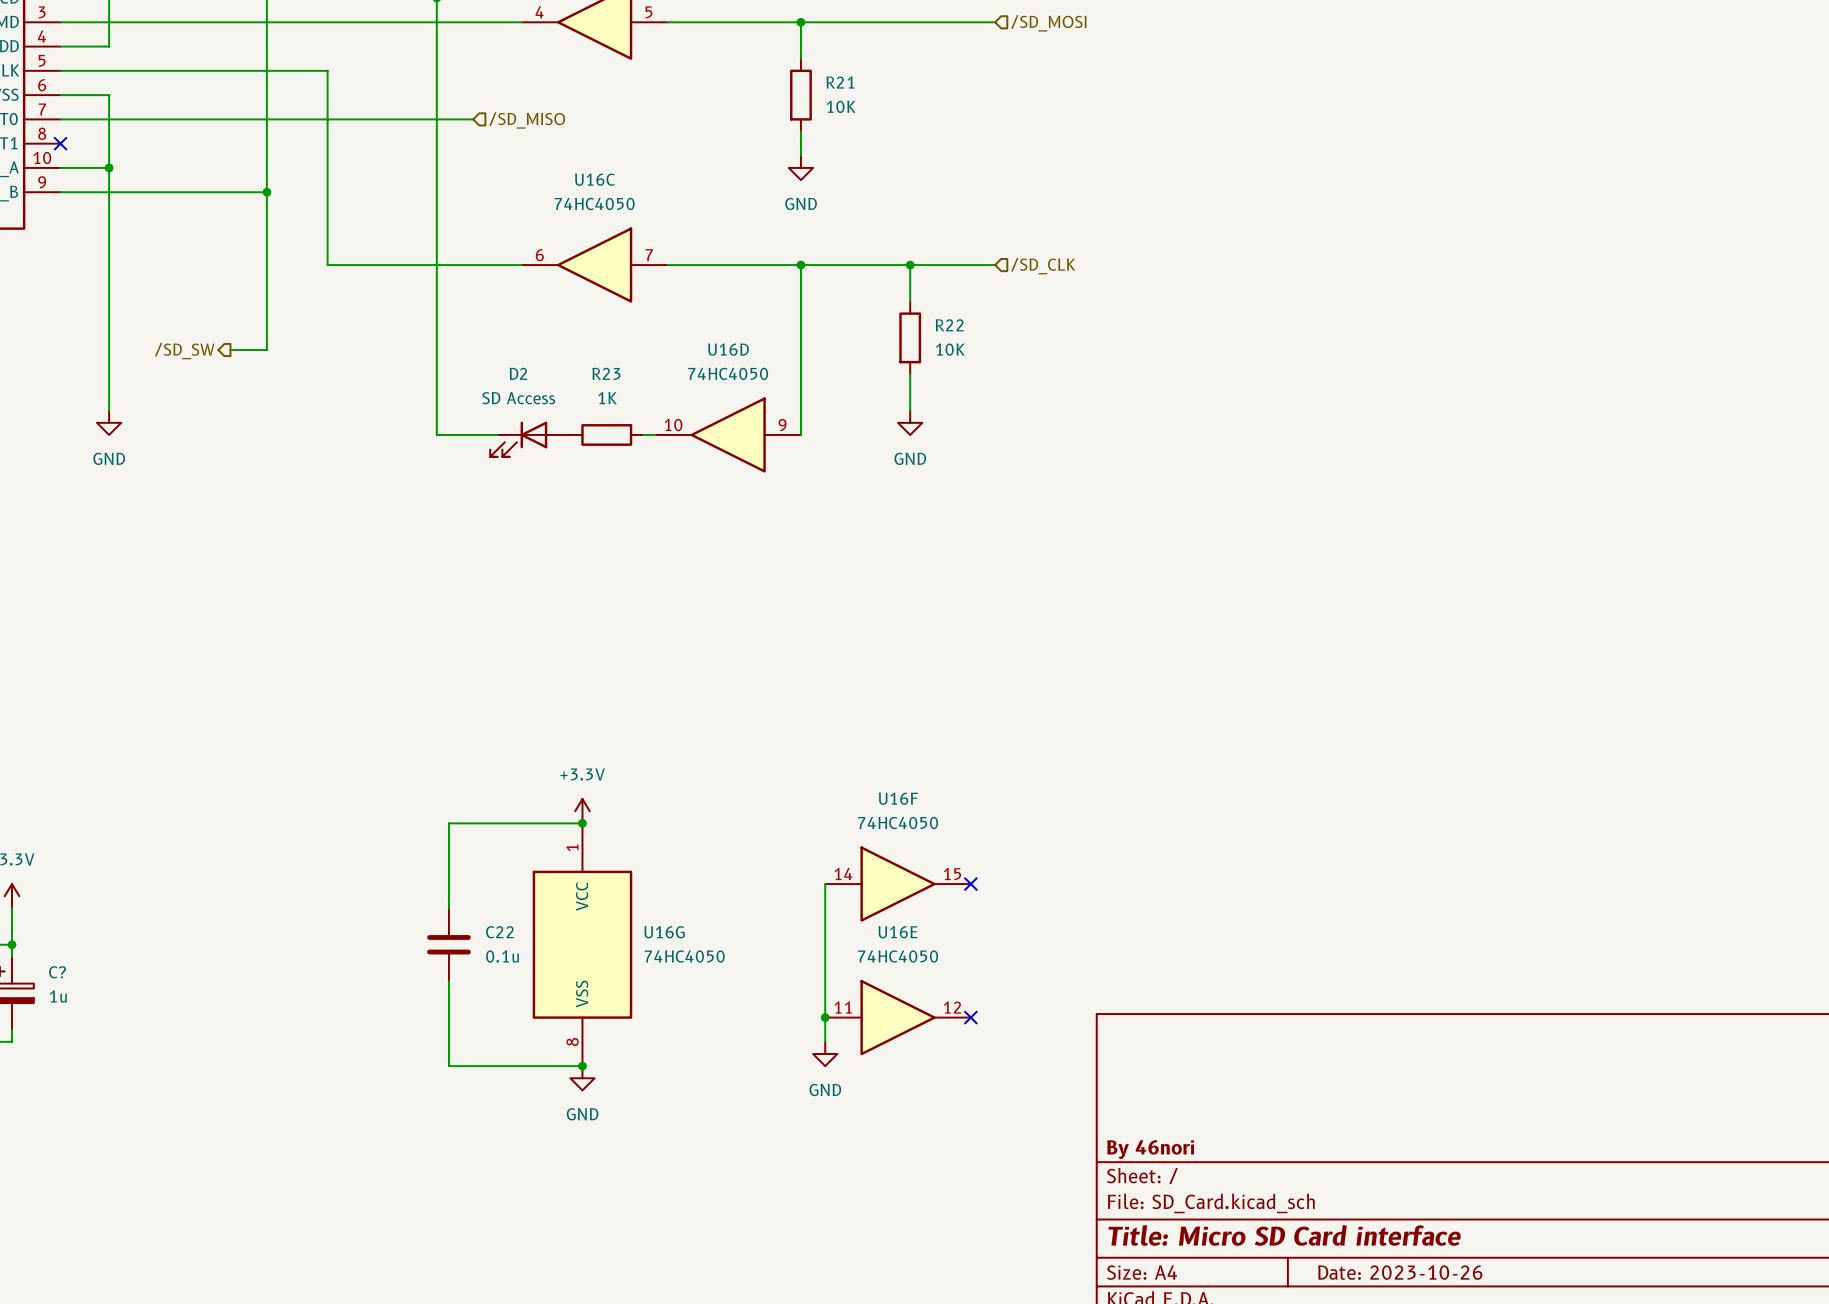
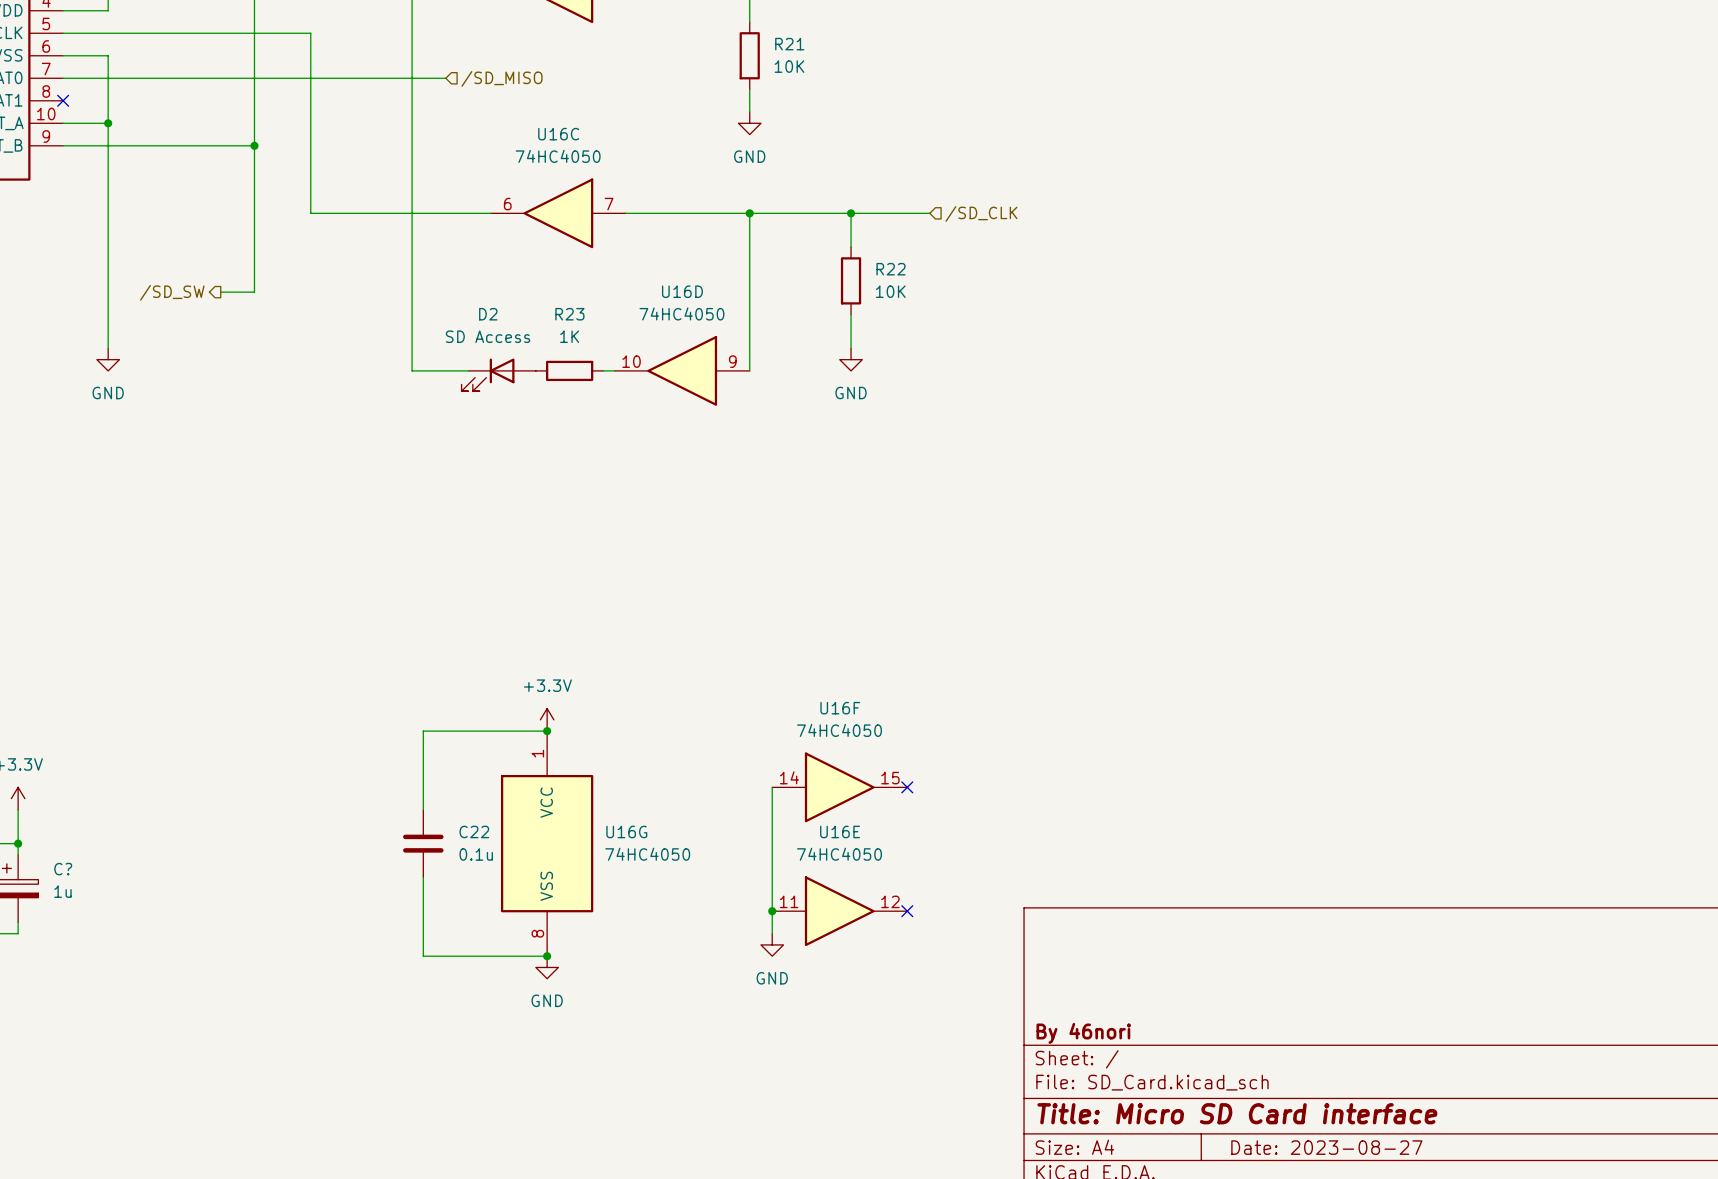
title block: Date: 2023-10-26 (1400, 1272) -> Date: 2023-08-27 (1326, 1147)

